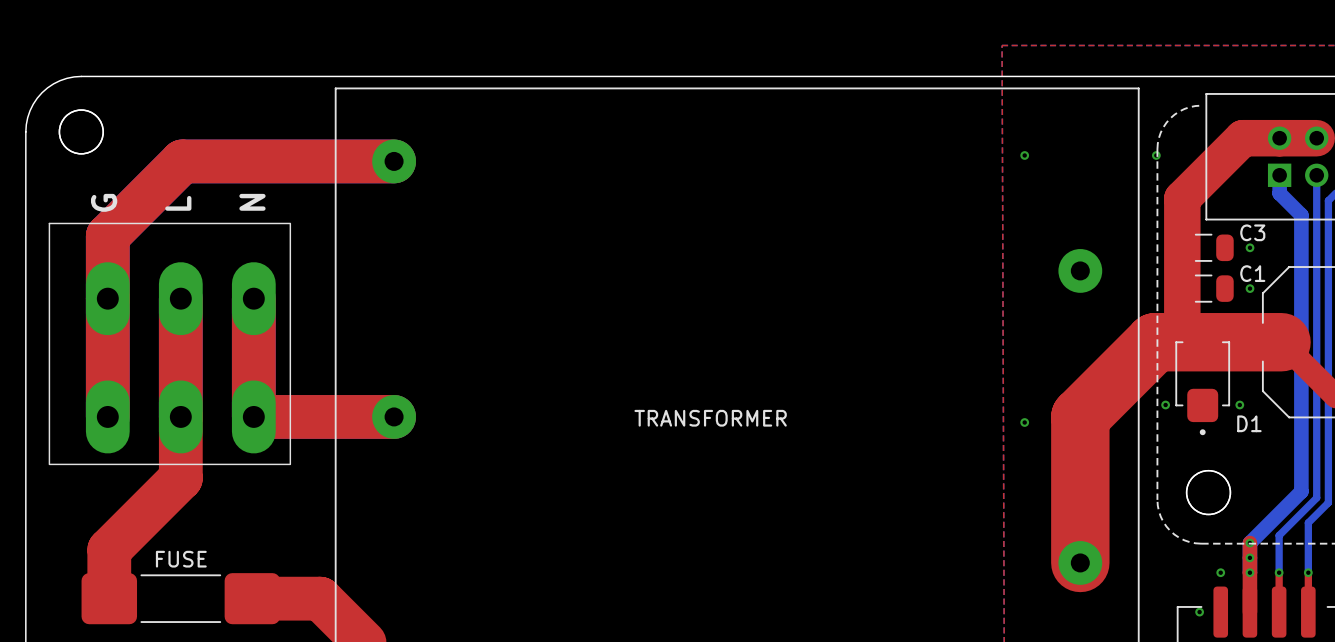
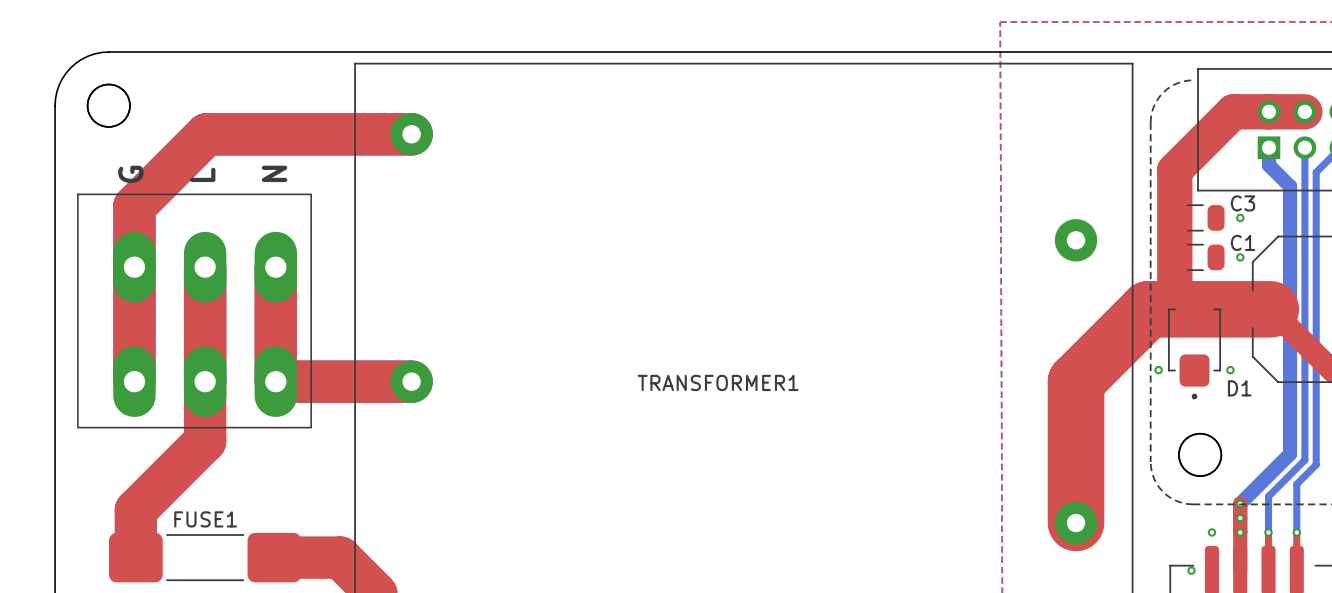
via: (1024, 155) -> none
via: (1156, 155) -> none
TRANSFORMER name: TRANSFORMER (710, 418) -> TRANSFORMER1 (718, 382)
via: (1024, 422) -> none
FUSE name: FUSE (181, 559) -> FUSE1 (205, 519)

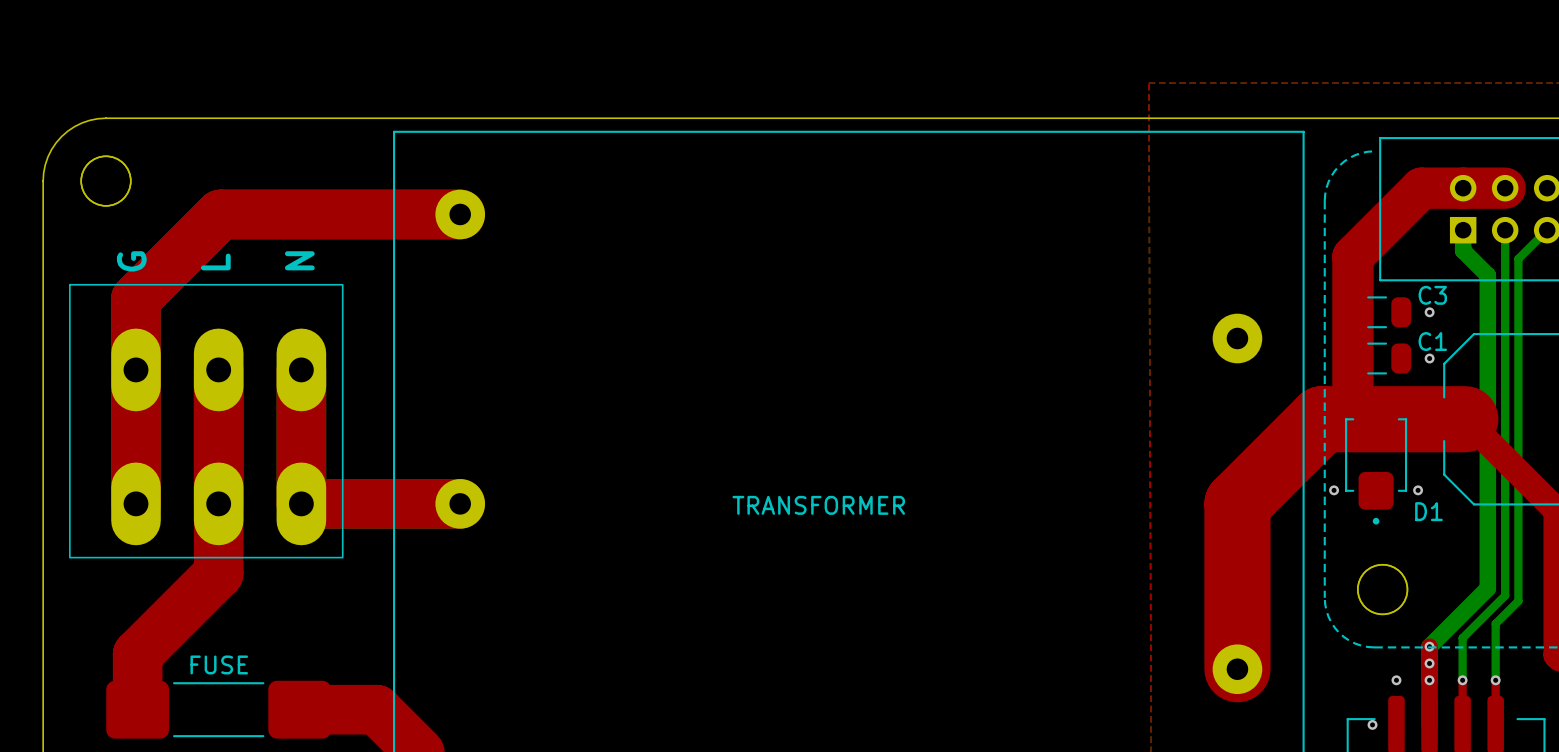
TRANSFORMER1 name: TRANSFORMER1 (718, 382) -> TRANSFORMER (818, 505)
FUSE1 name: FUSE1 (205, 519) -> FUSE (219, 664)

